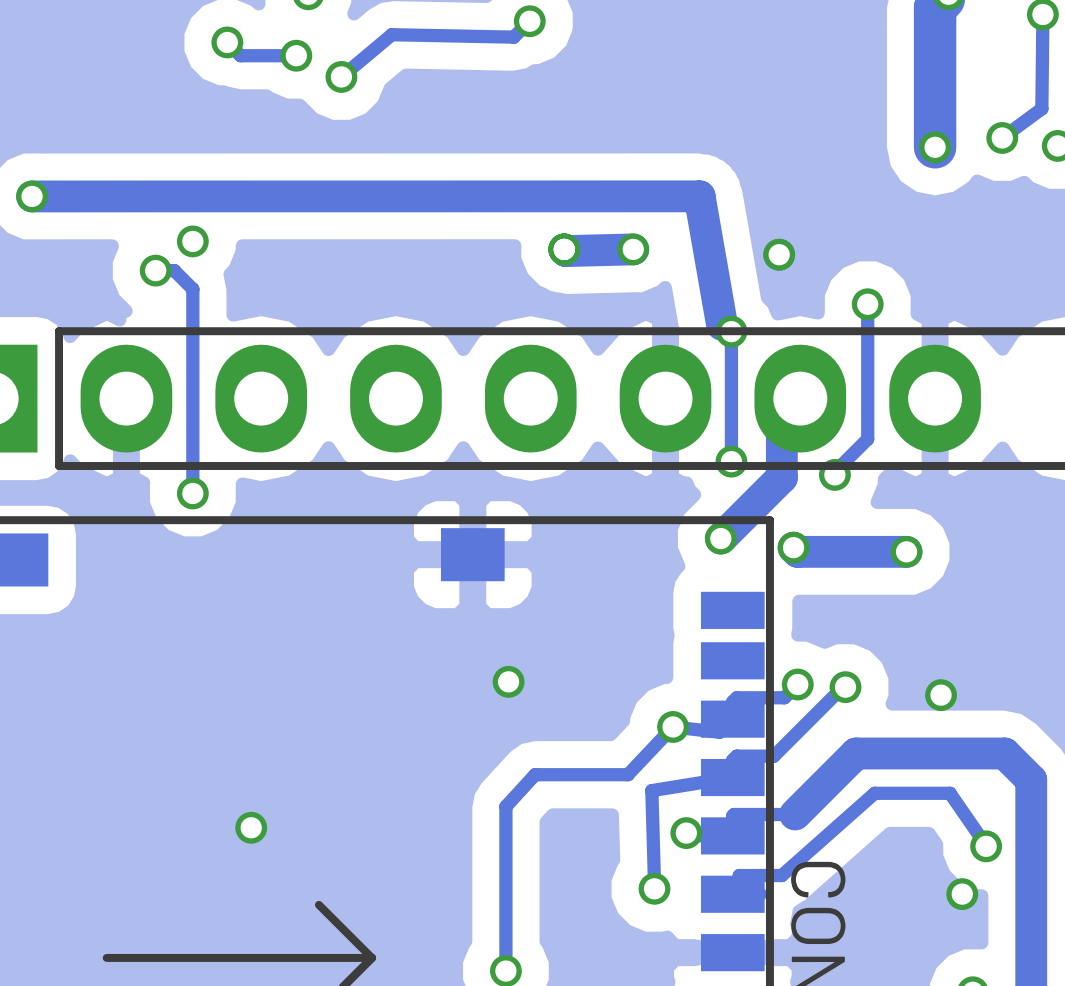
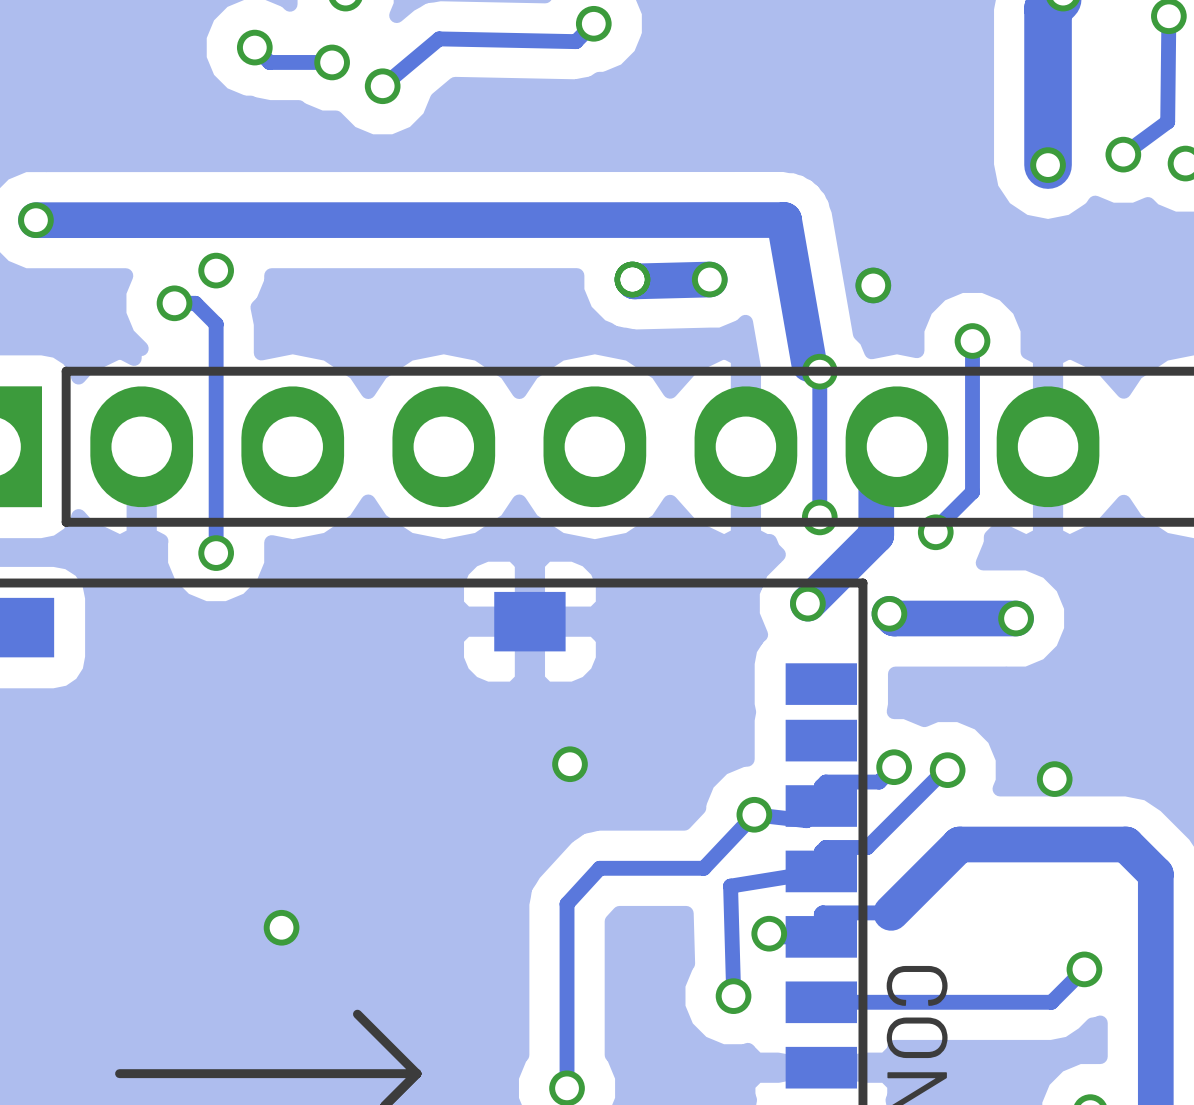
track: (986, 846) (988, 848) (950, 793) (874, 793) (781, 875) (739, 875) (732, 894) -> none
via: (986, 846) -> none
track: none -> (1084, 969) (1051, 1002) (852, 1002)
via: none -> (1084, 969)
via: (962, 894) -> none

